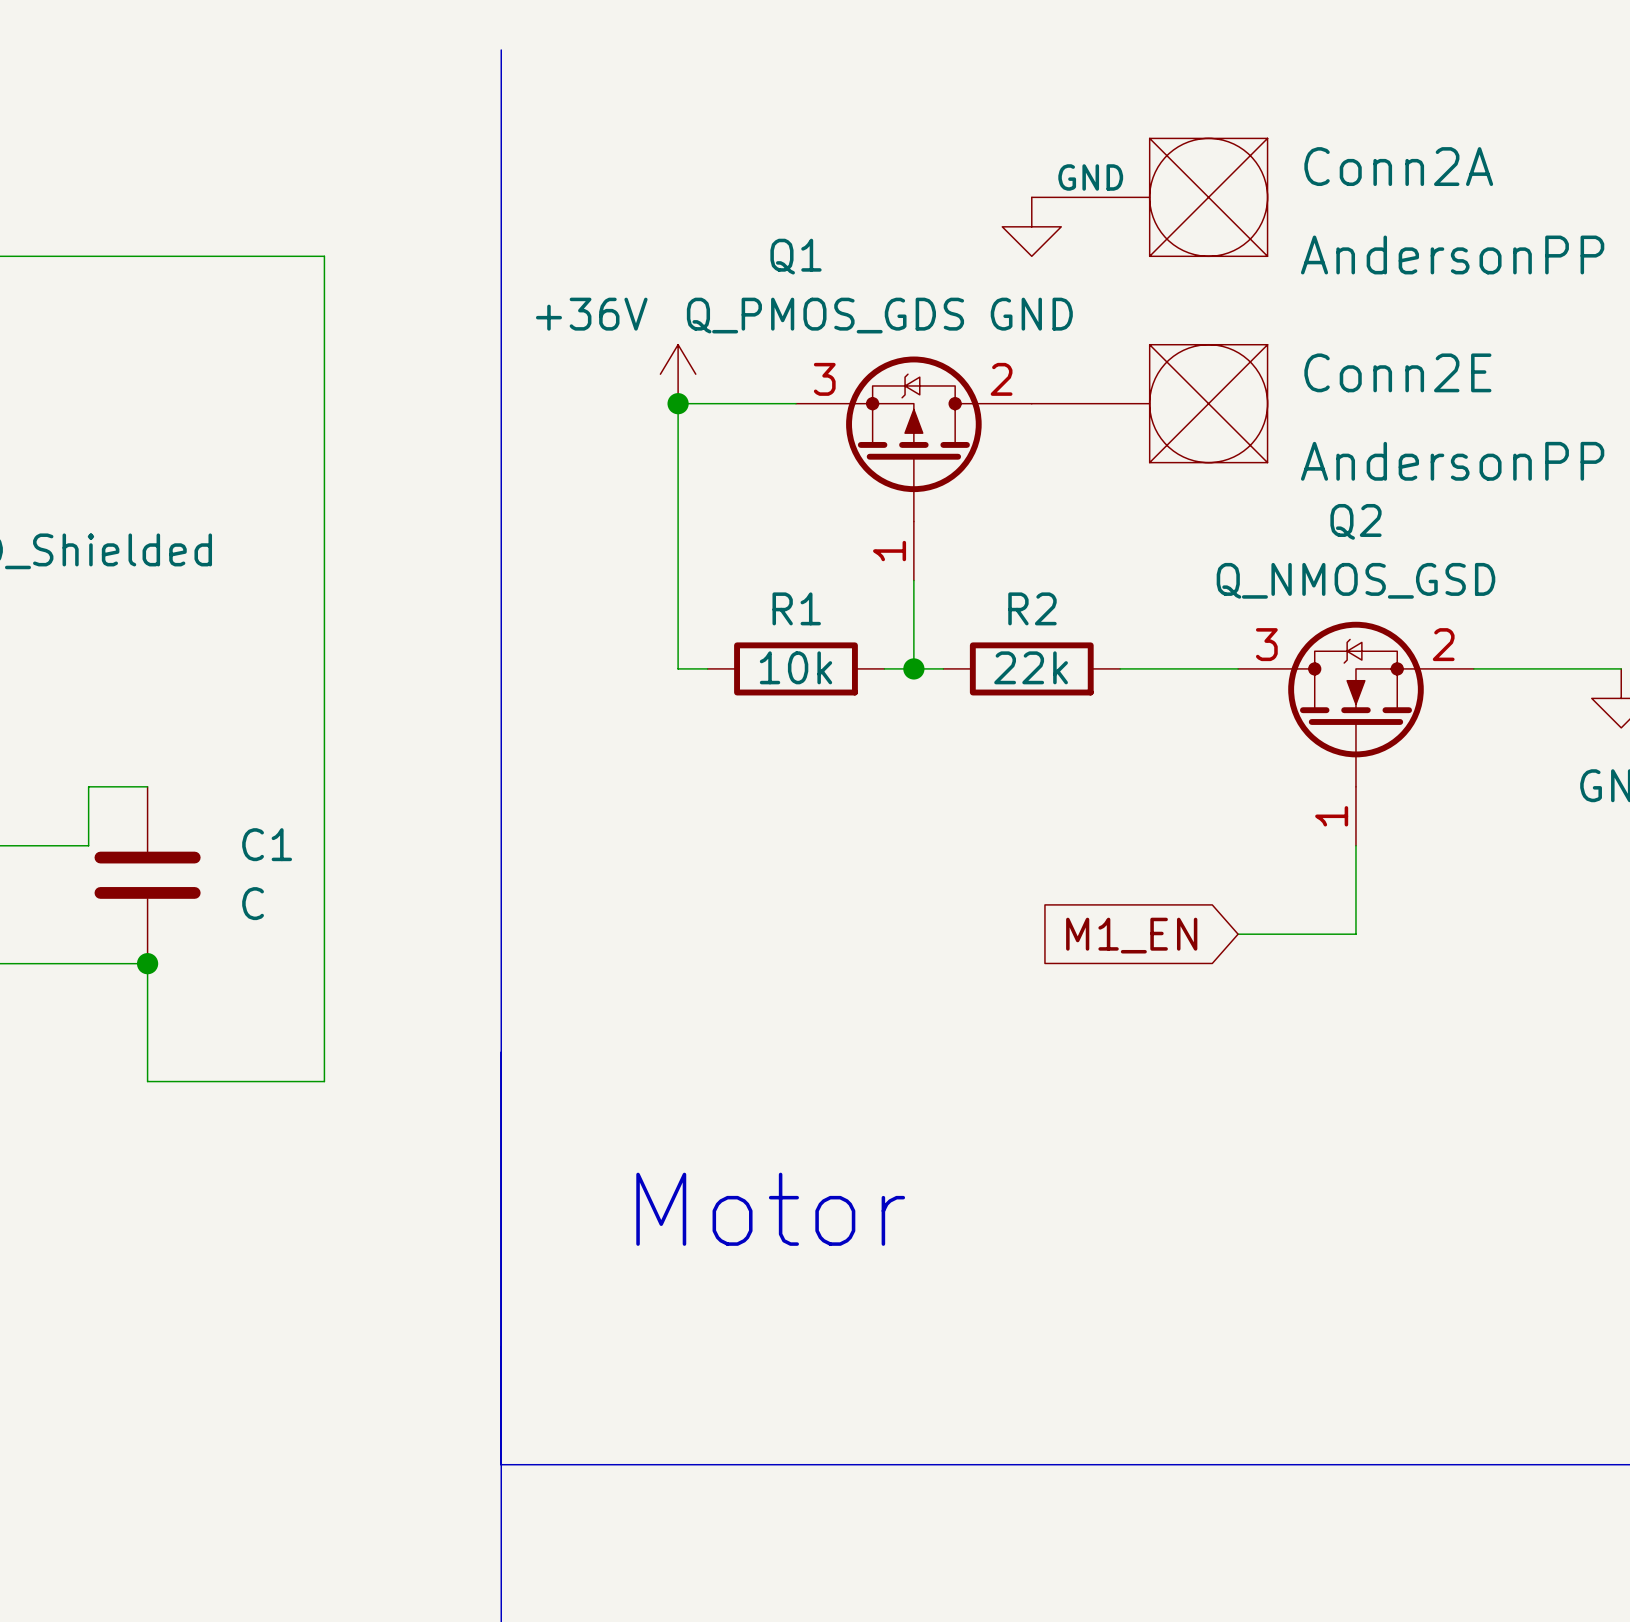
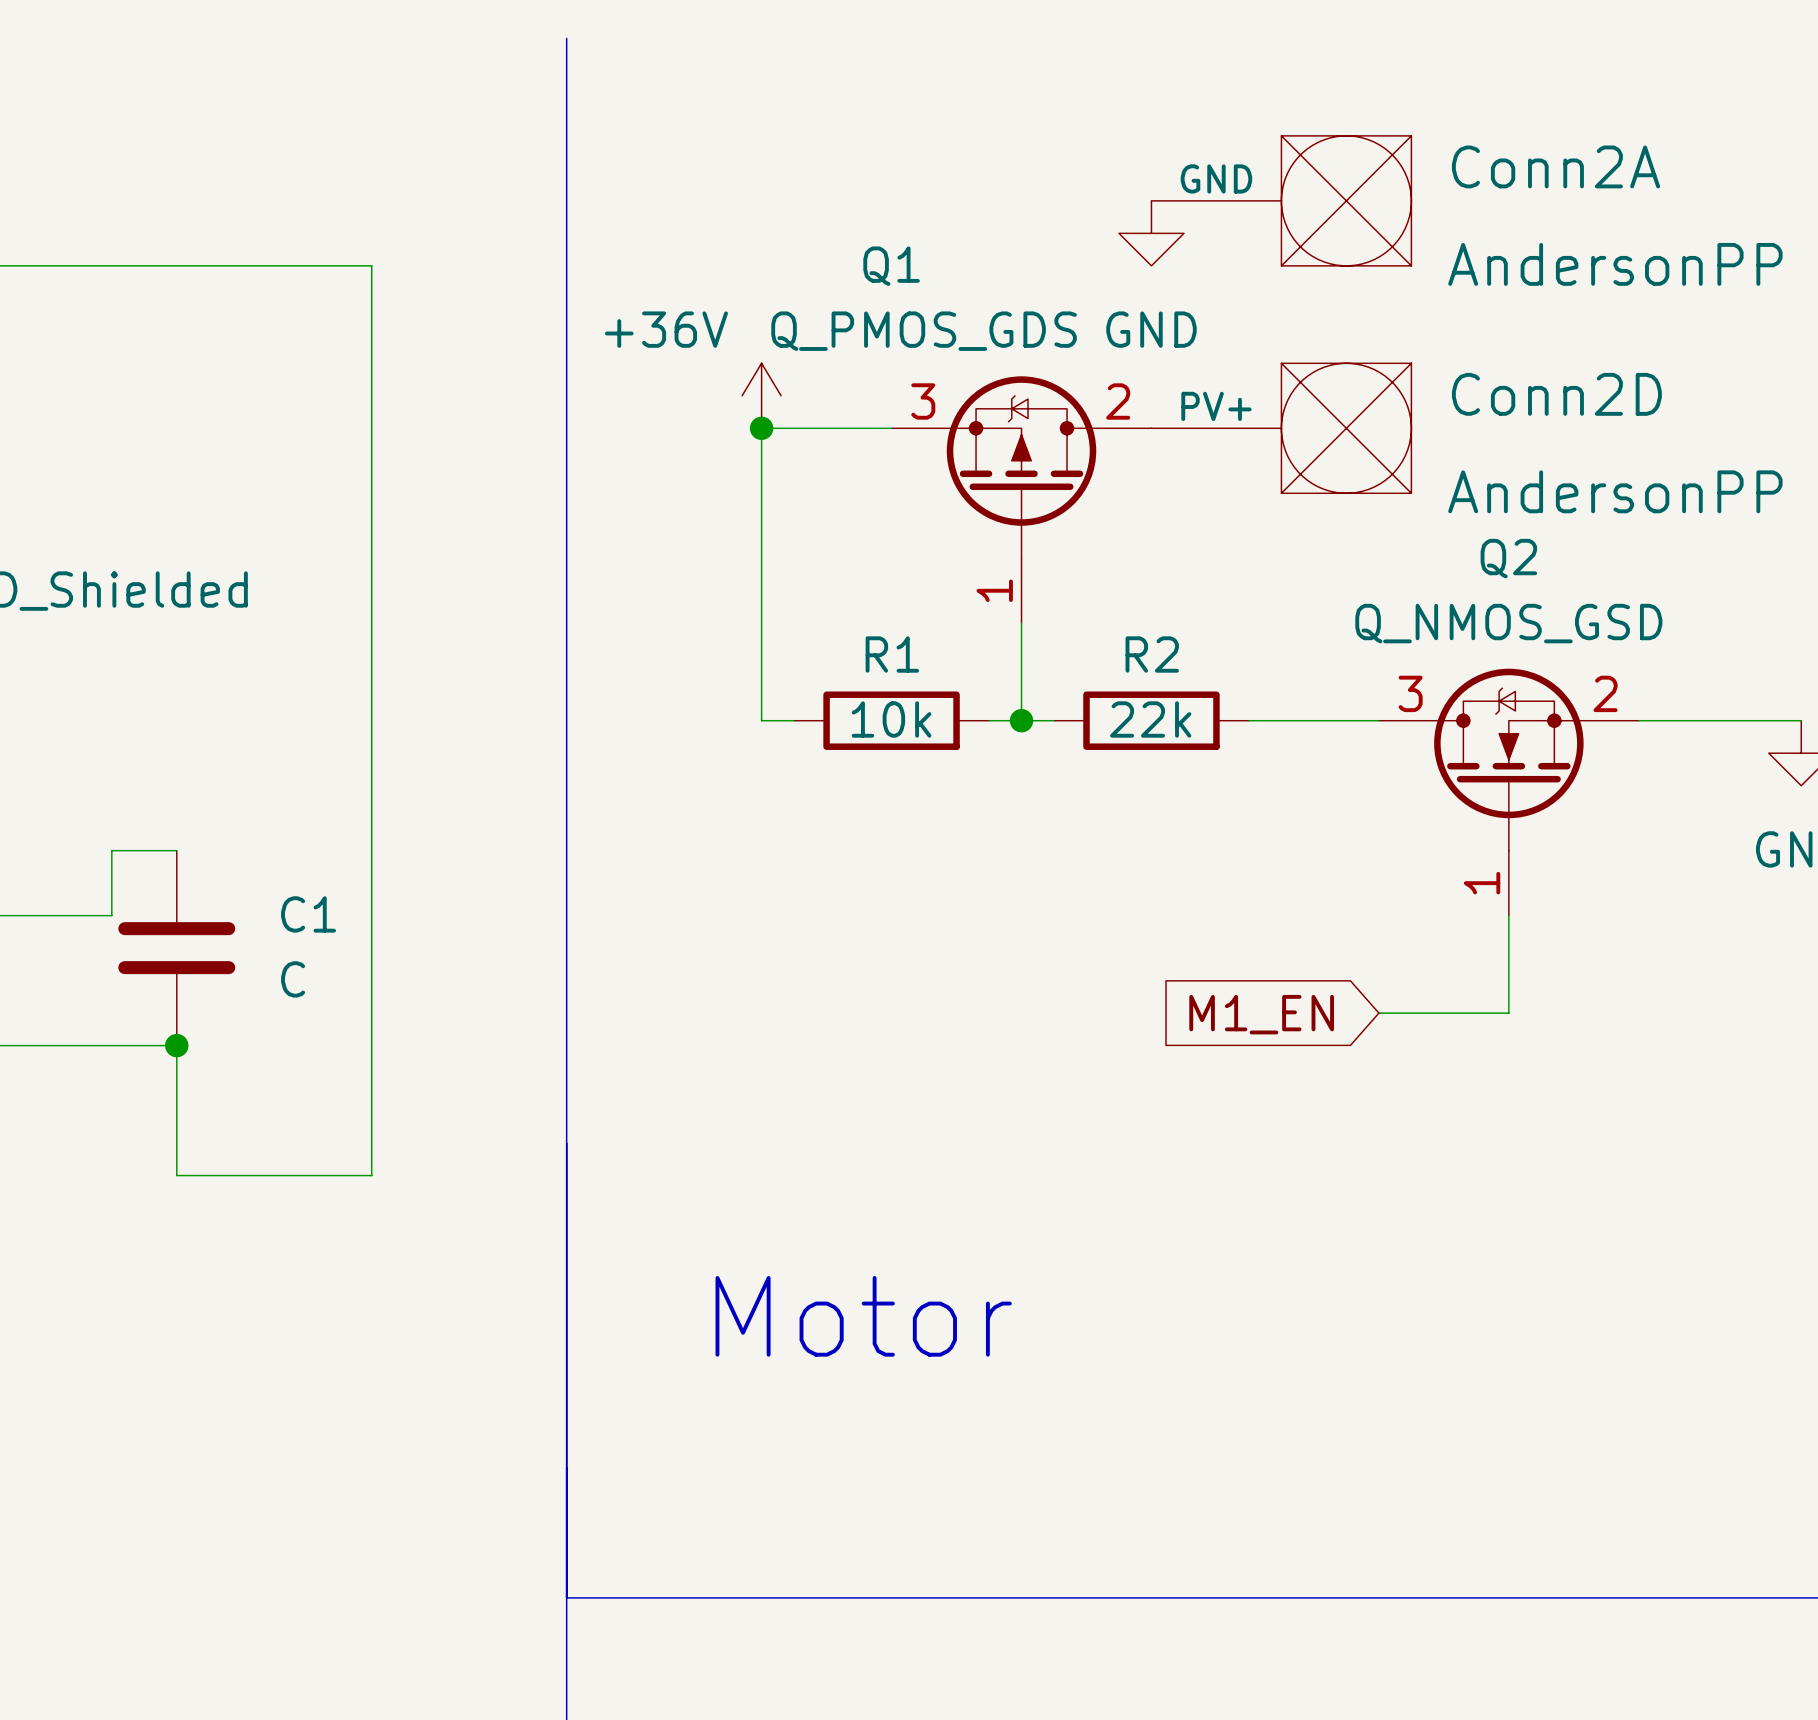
Conn2E name: Conn2E (1397, 372) -> Conn2D (1556, 394)
Conn2E pin name: none -> PV+ (1216, 406)

